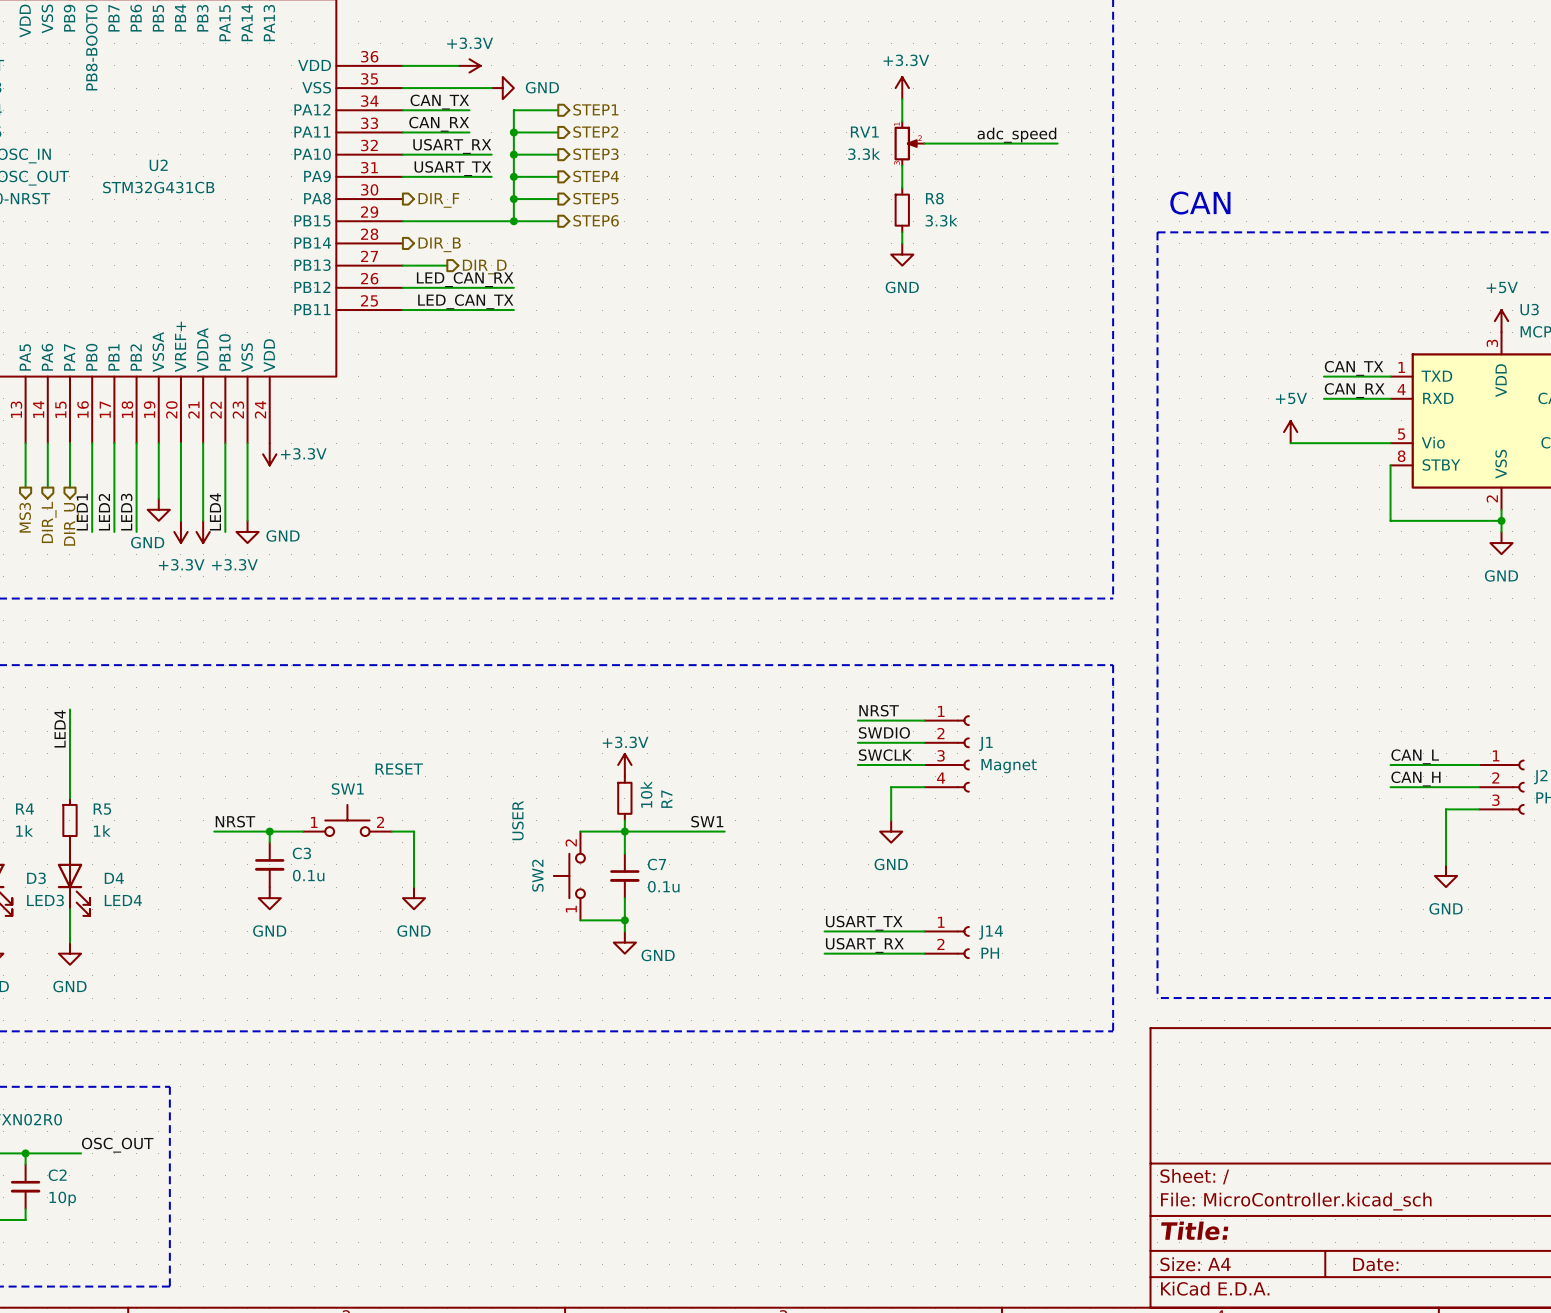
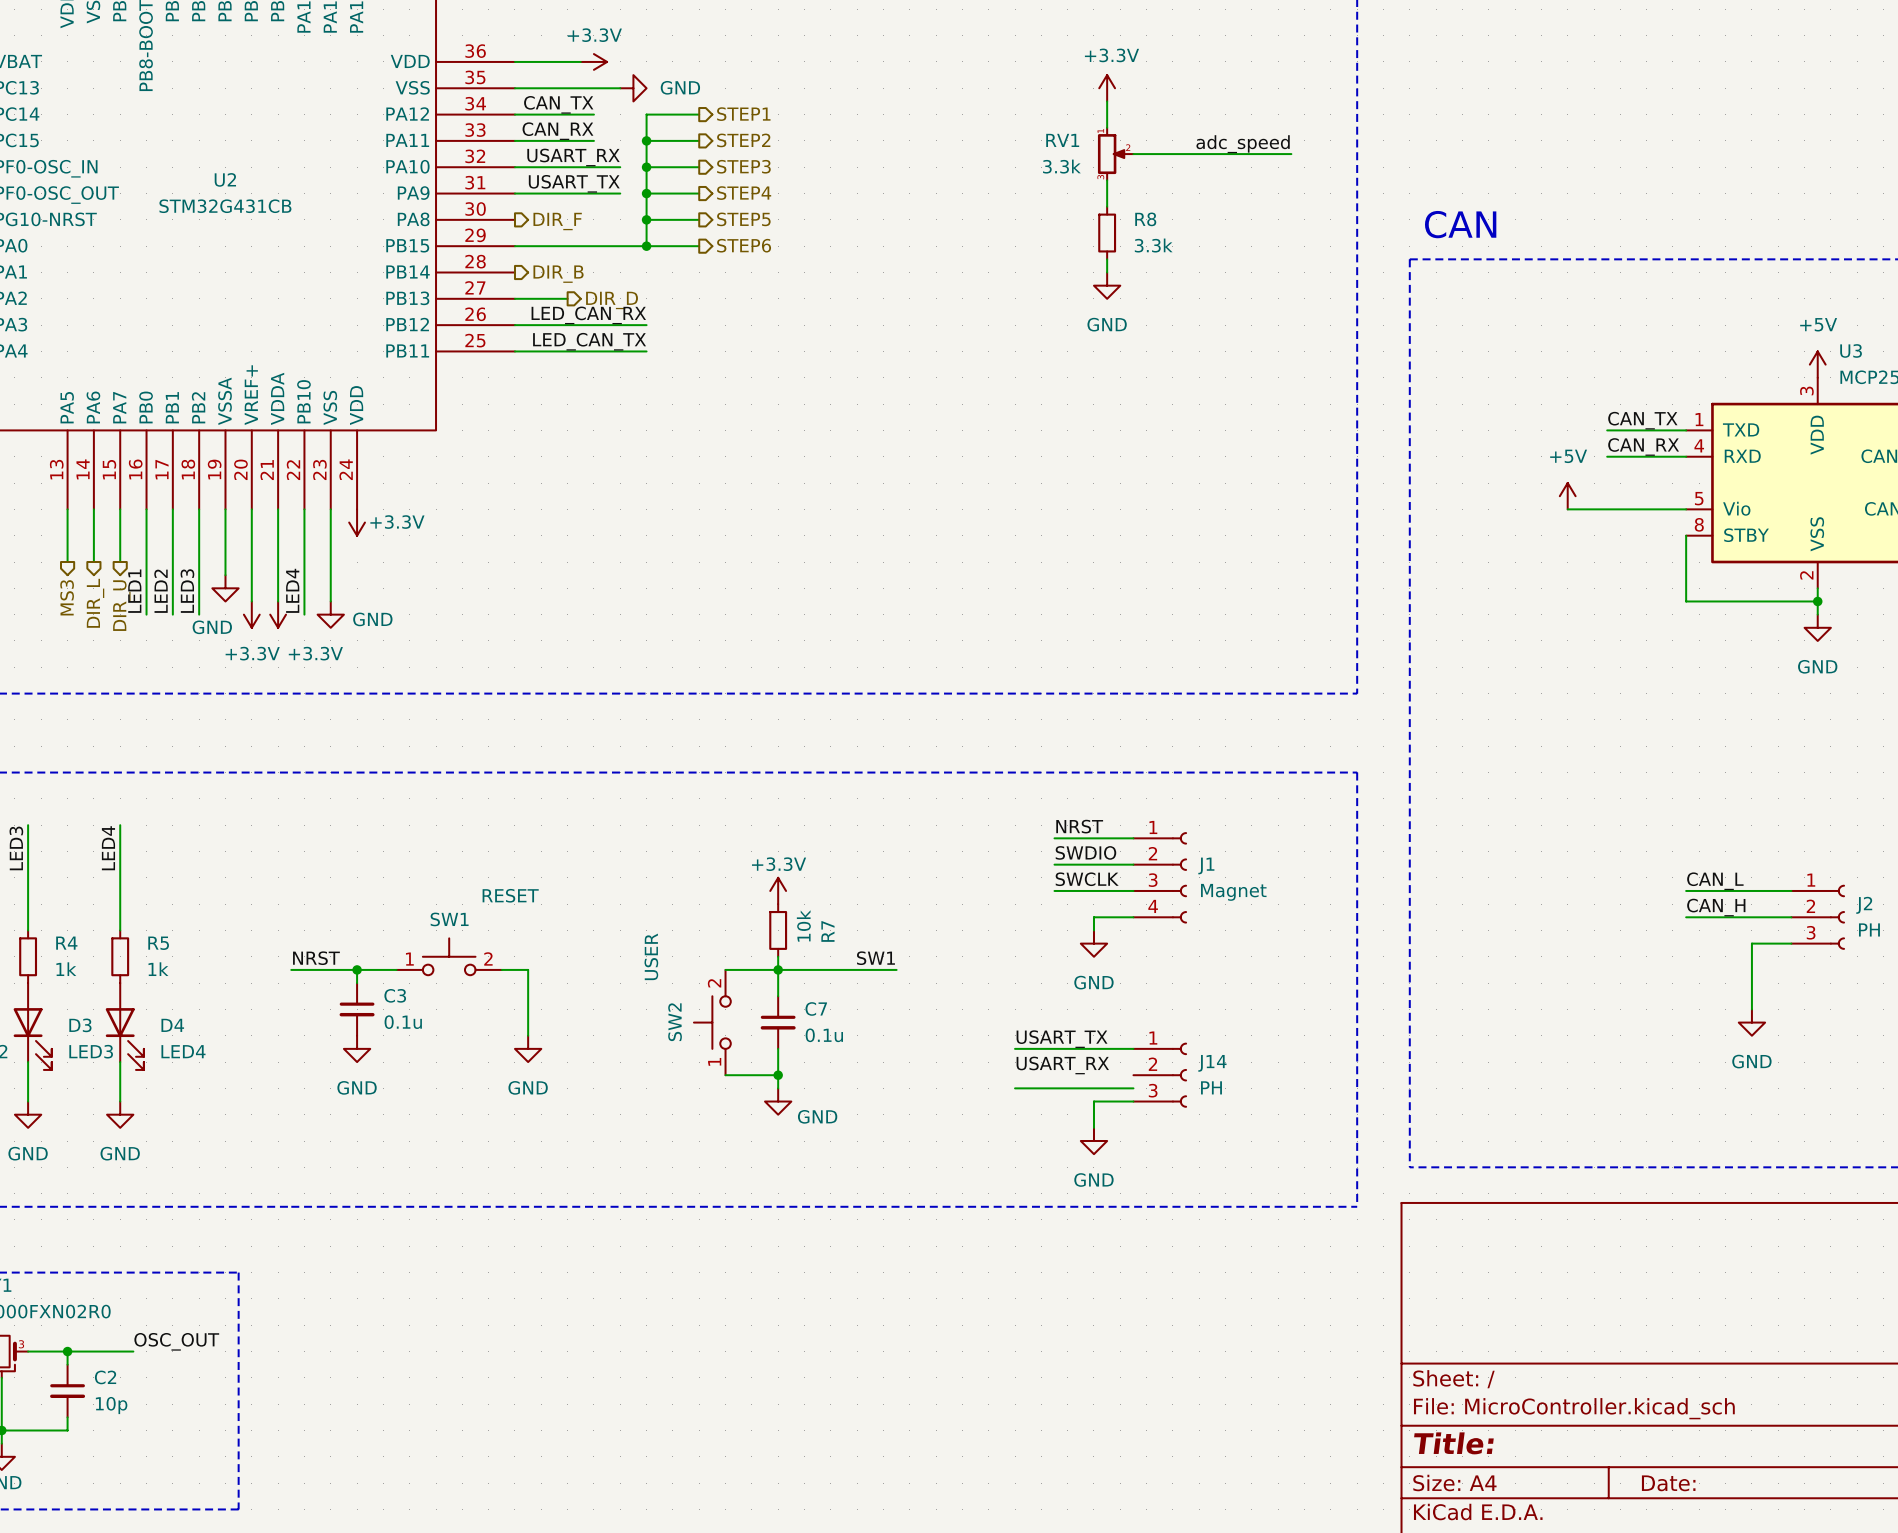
power symbol position: GND (891, 831) -> GND (1093, 943)
label position: USART_TX (864, 923) -> USART_TX (1062, 1039)
J14 symbol: [924, 926, 970, 959] -> [1133, 1042, 1187, 1108]
wire: none -> (1133, 1101) (1093, 1101) (1093, 1127)
label position: USART_RX (864, 945) -> USART_RX (1062, 1065)
wire: (824, 953) (924, 953) -> (1015, 1048) (1133, 1048)
power symbol: none -> GND (1093, 1141)

